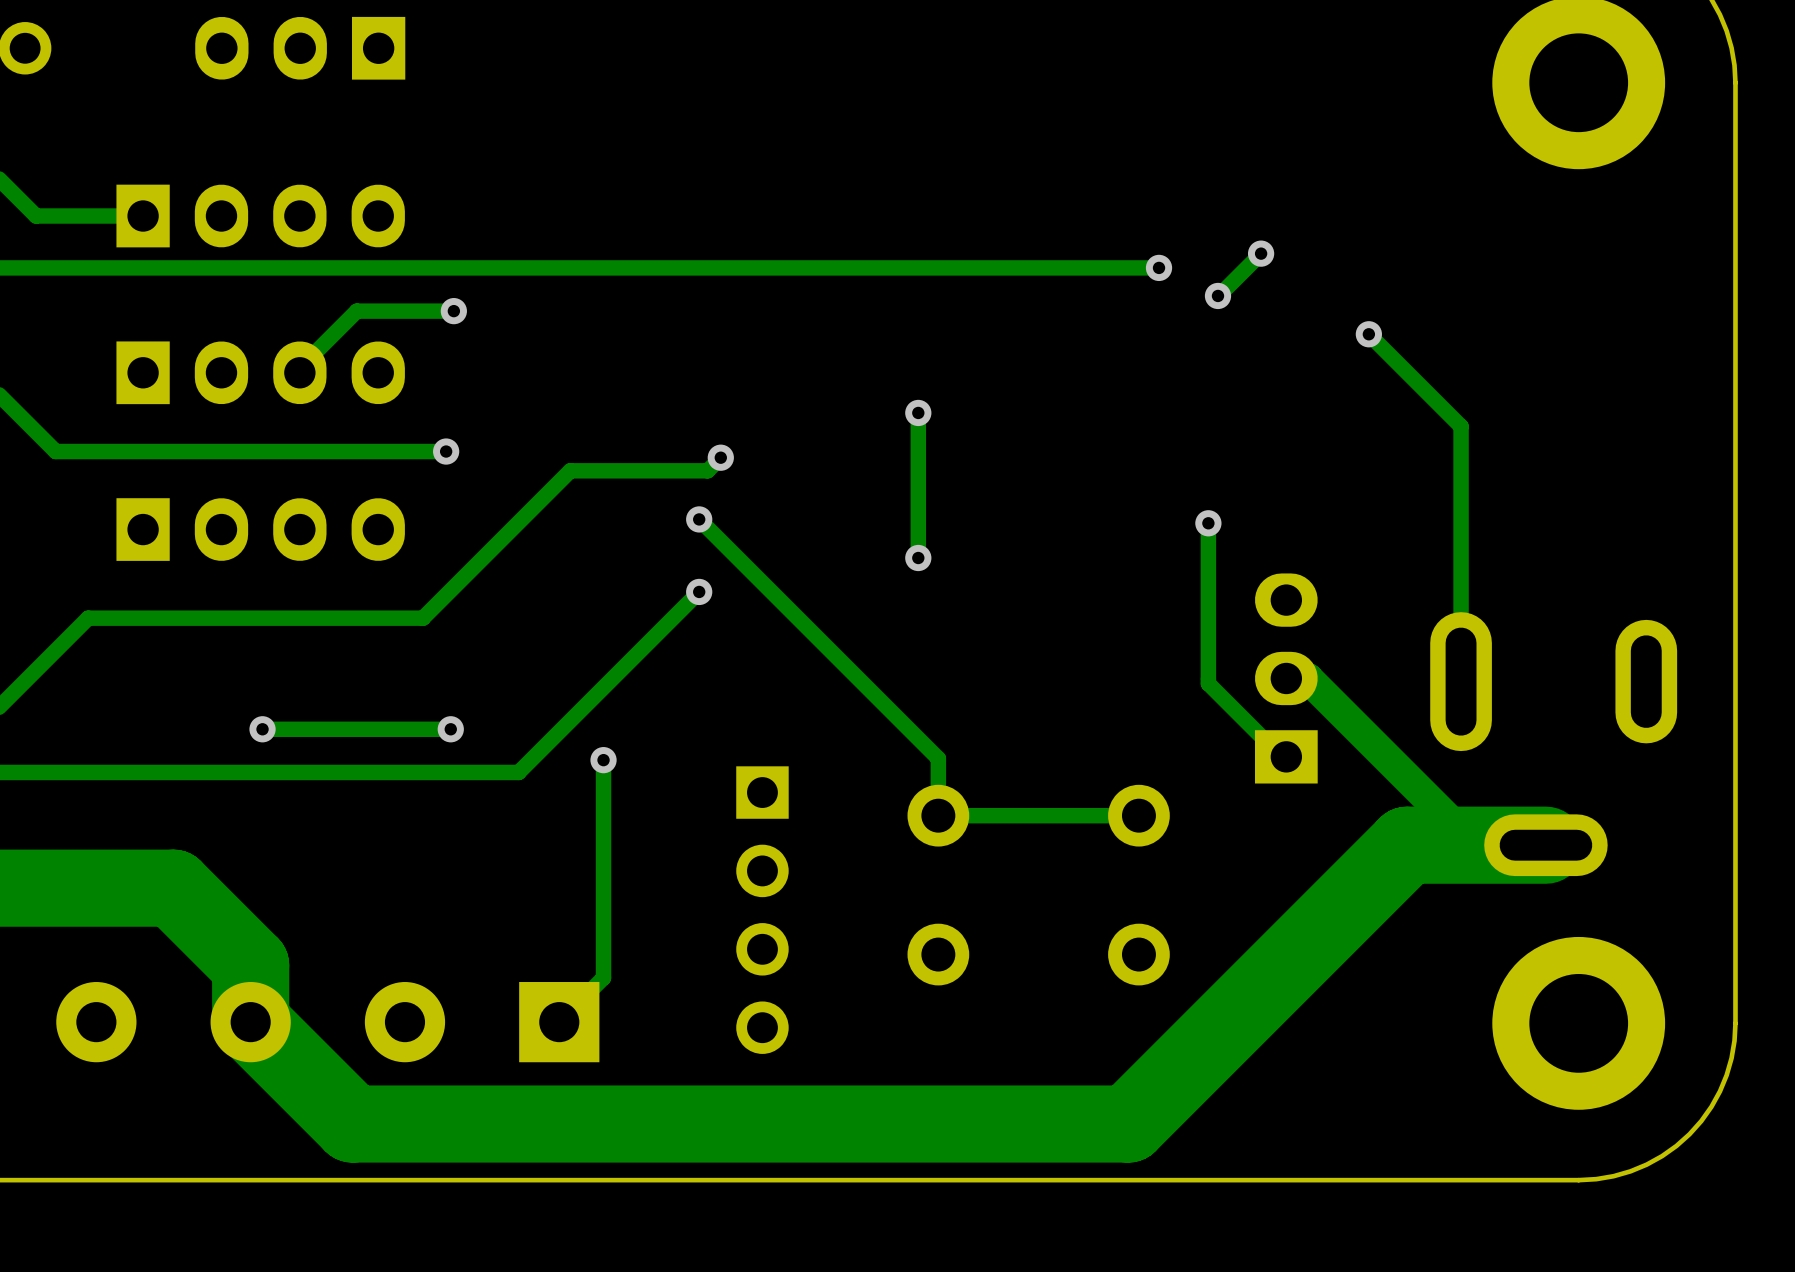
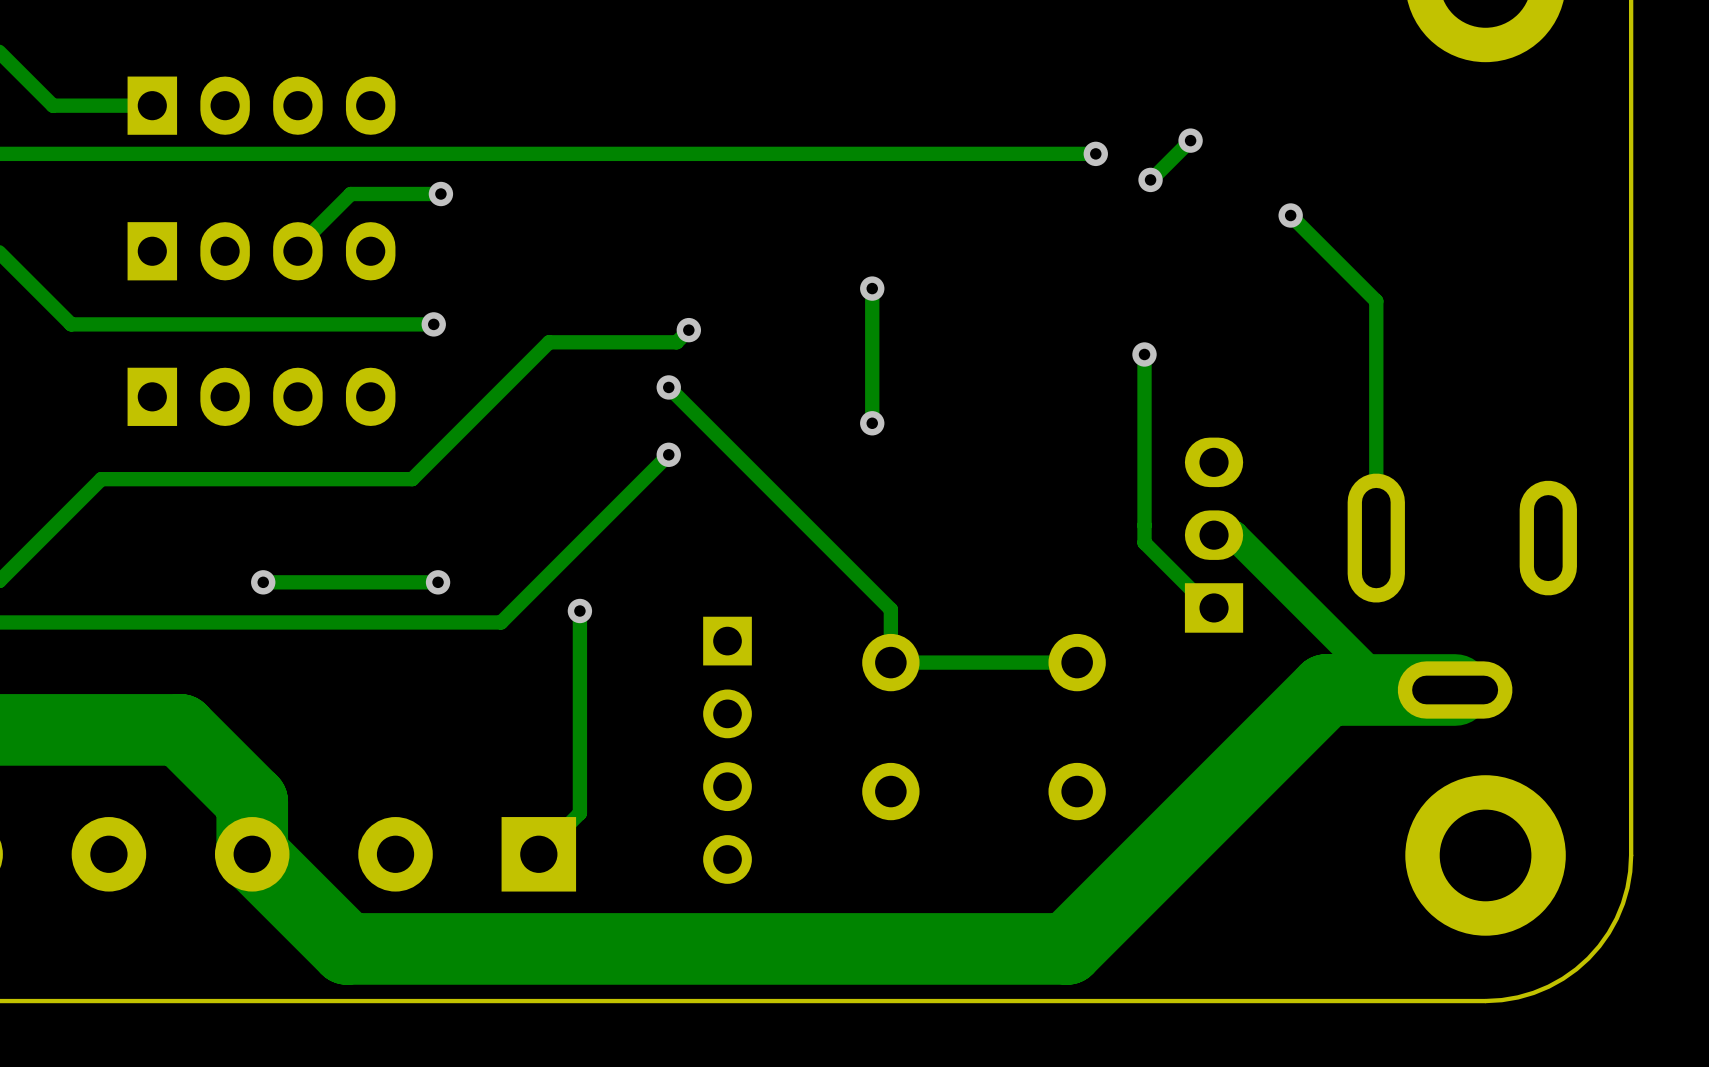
track: (1208, 523) (1208, 683) (1211, 686) -> (1144, 354) (1144, 542)
via position: (1208, 523) -> (1144, 354)

